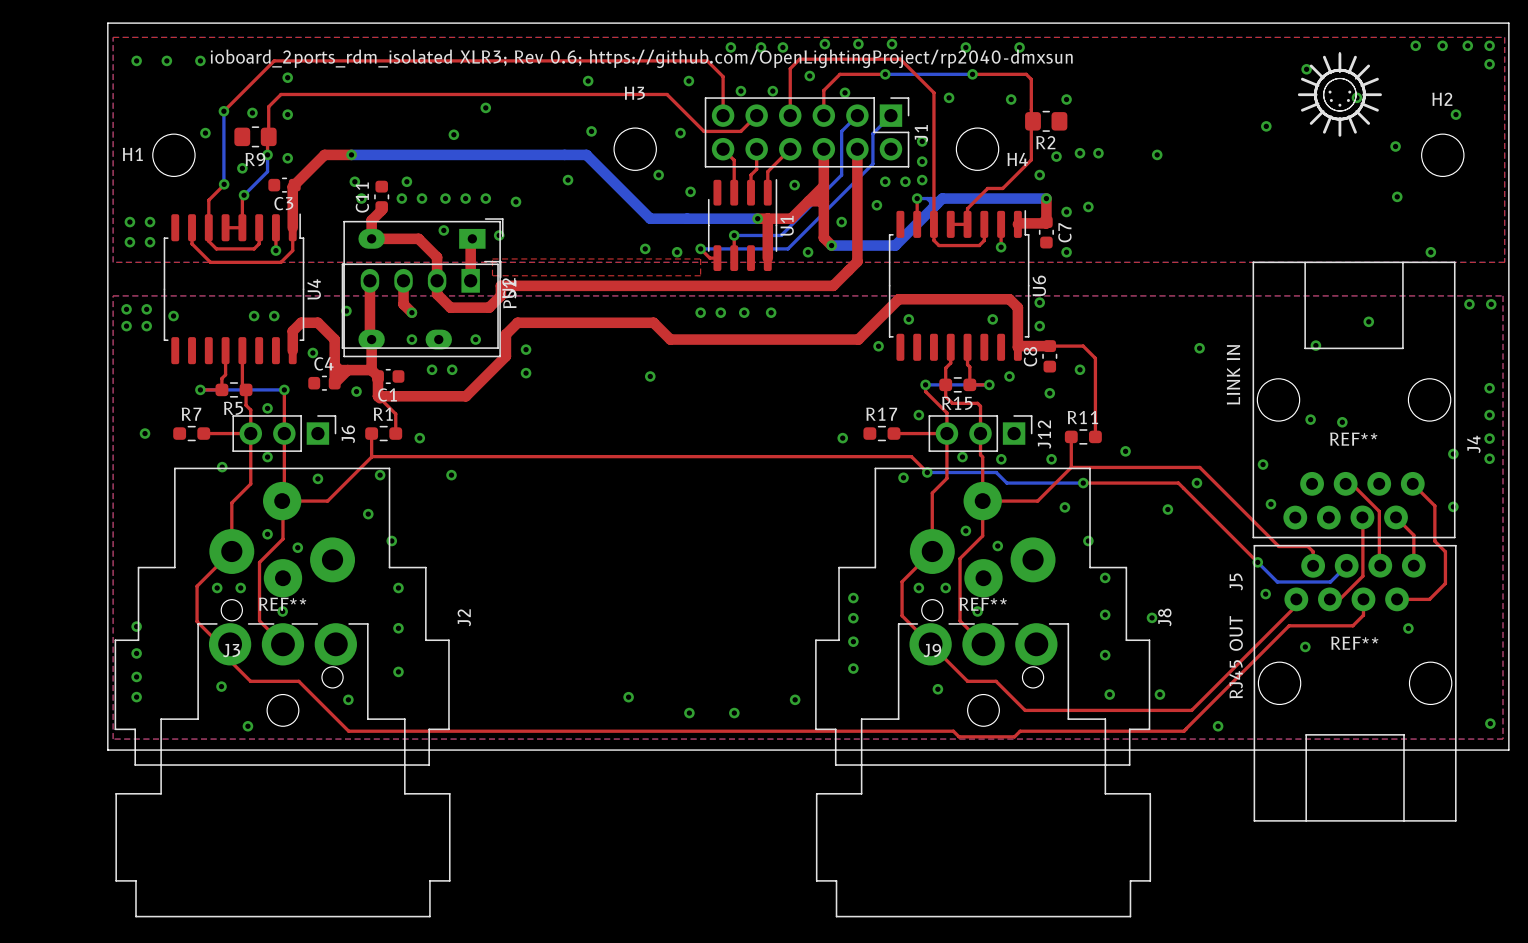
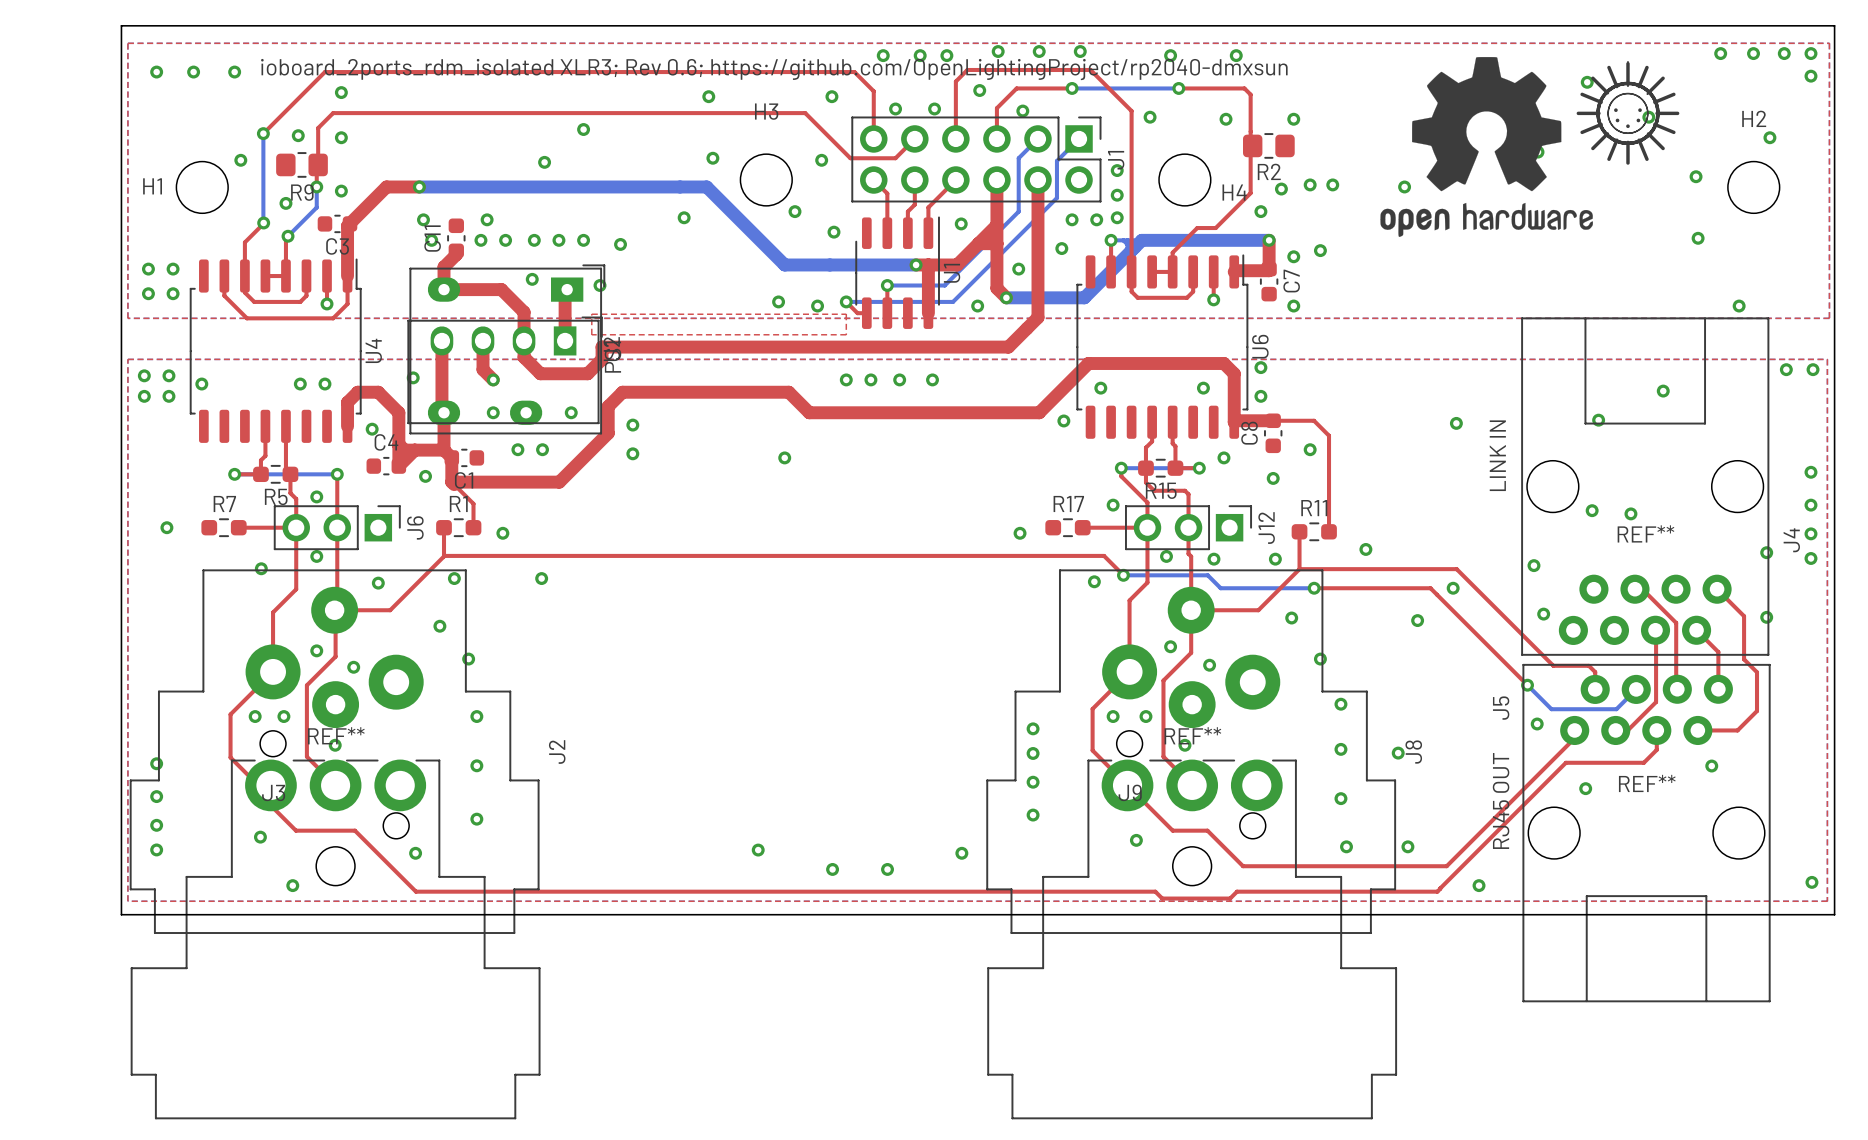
drawing: none -> [1380, 57, 1593, 237]

